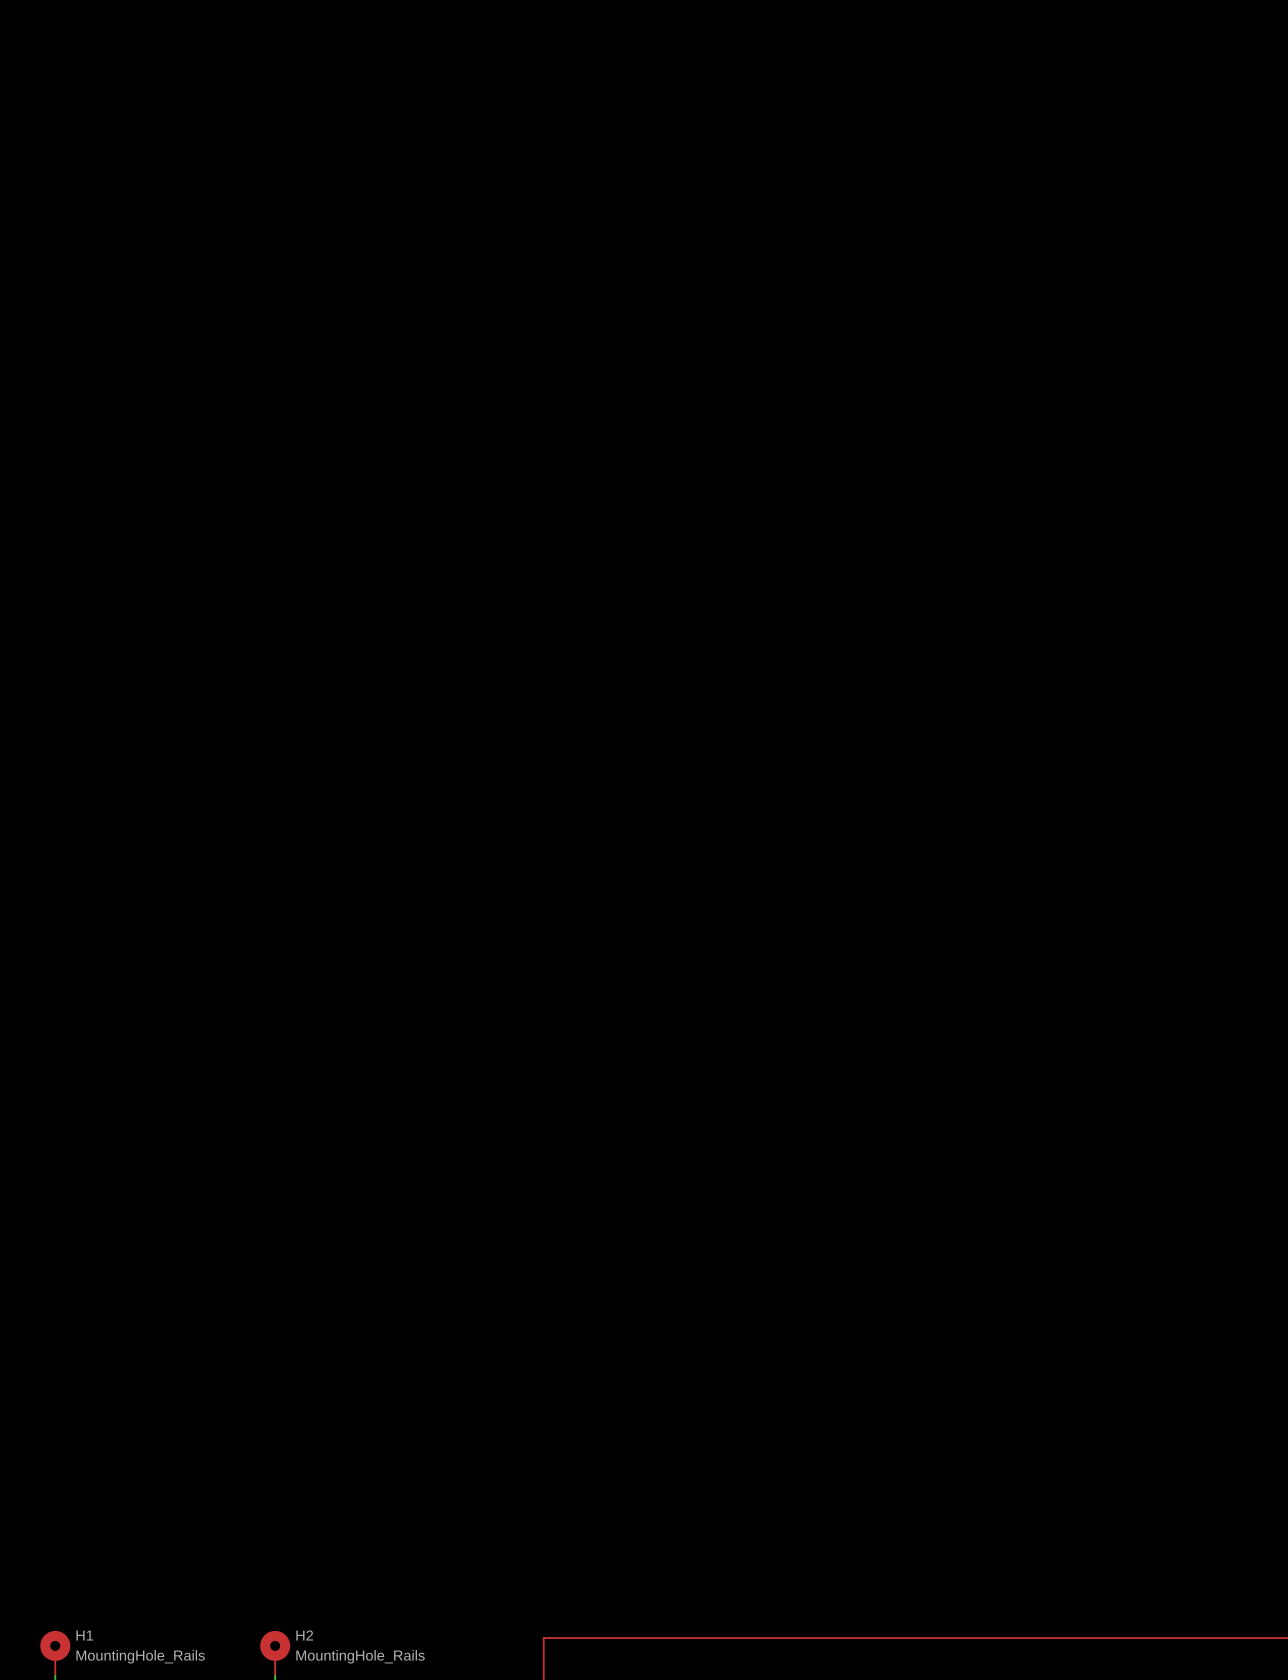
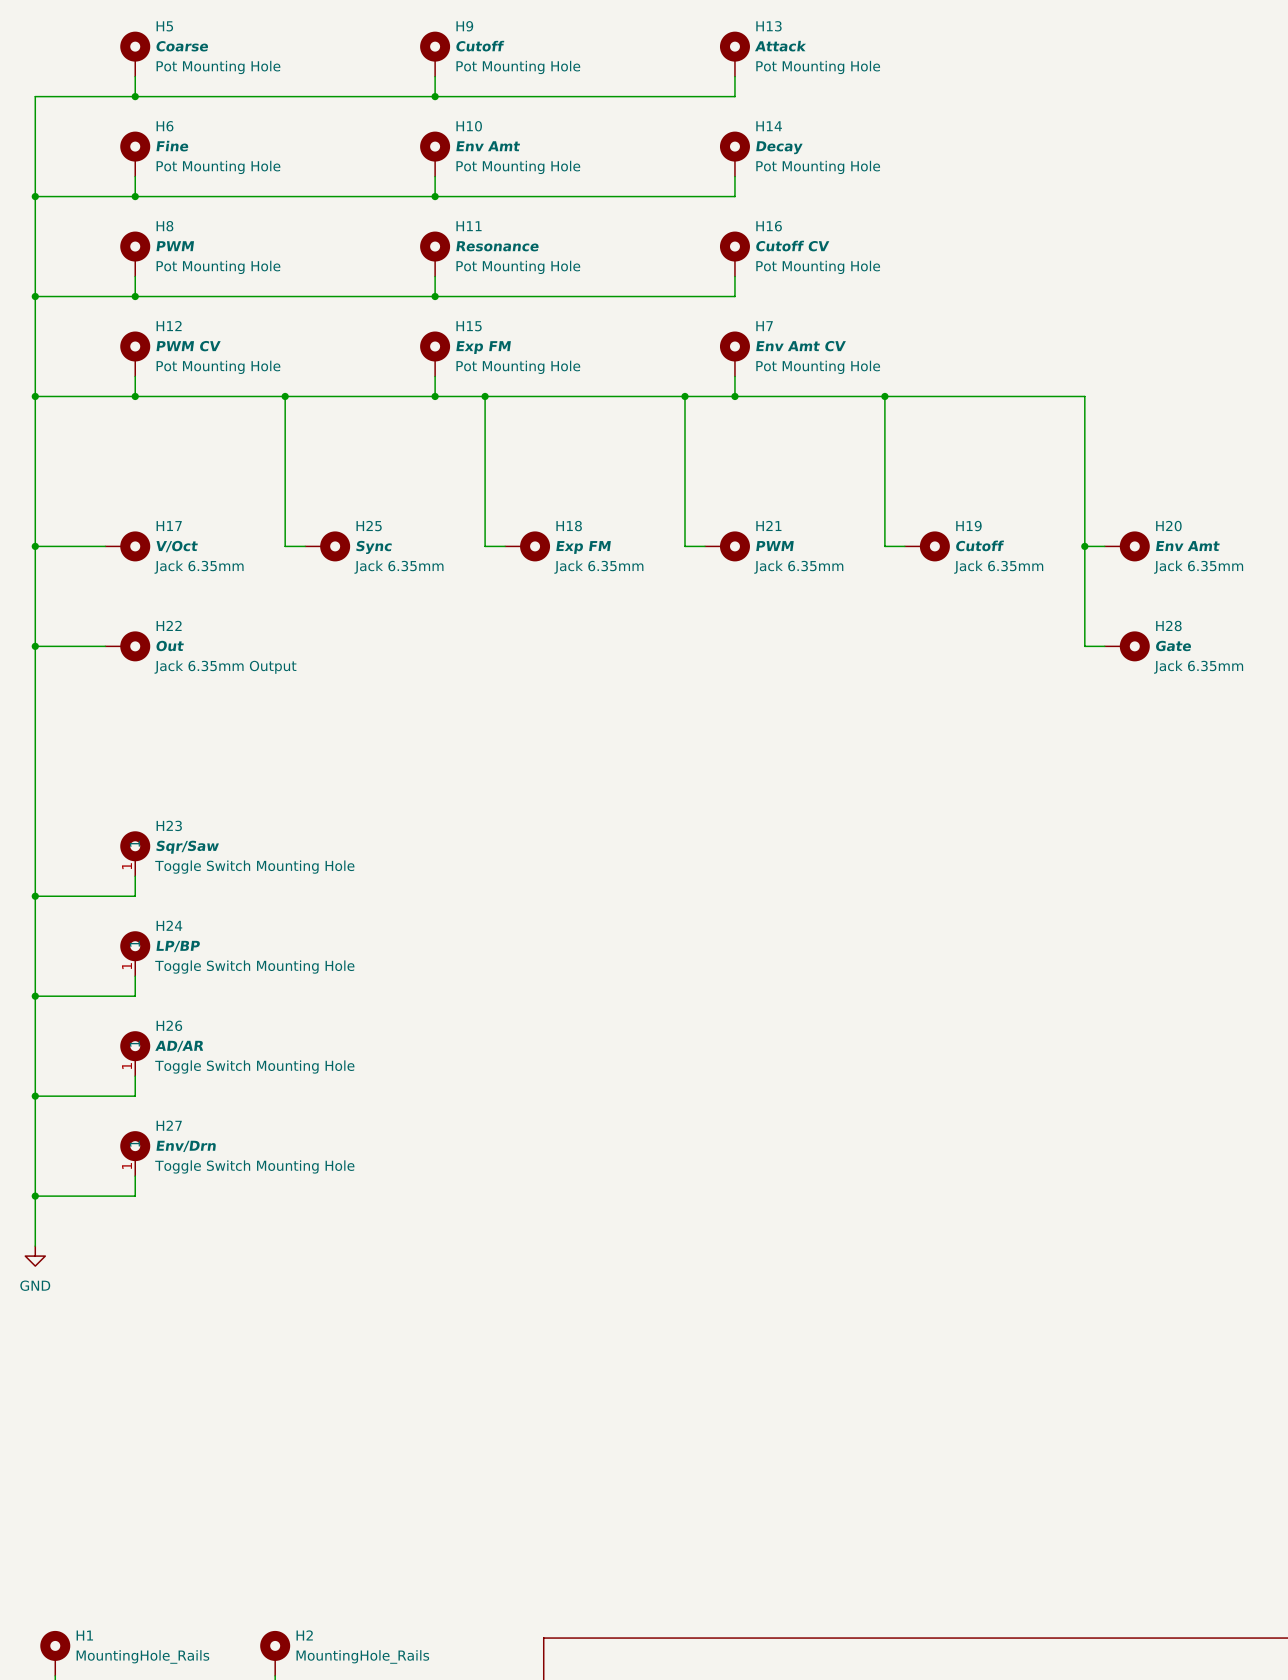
H5: none -> Coarse (135, 54)
H9: none -> Cutoff (435, 54)
H13: none -> Attack (734, 54)
wire: none -> (135, 76) (135, 96)
wire: none -> (435, 76) (435, 96)
wire: none -> (734, 76) (734, 96) (35, 96) (35, 1246)
junction: none -> (135, 96)
junction: none -> (435, 96)
H6: none -> Fine (135, 154)
H10: none -> Env Amt (435, 154)
H14: none -> Decay (734, 154)
wire: none -> (135, 176) (135, 196)
wire: none -> (435, 176) (435, 196)
wire: none -> (734, 176) (734, 196) (35, 196)
junction: none -> (35, 196)
junction: none -> (135, 196)
junction: none -> (435, 196)
H8: none -> PWM (135, 254)
H11: none -> Resonance (435, 254)
H16: none -> Cutoff CV (734, 254)
wire: none -> (135, 276) (135, 296)
wire: none -> (435, 276) (435, 296)
wire: none -> (734, 276) (734, 296) (35, 296)
junction: none -> (35, 296)
junction: none -> (135, 296)
junction: none -> (435, 296)
H12: none -> PWM CV (135, 353)
H15: none -> Exp FM (435, 353)
H7: none -> Env Amt CV (734, 353)
wire: none -> (135, 376) (135, 396)
wire: none -> (435, 376) (435, 396)
wire: none -> (734, 376) (734, 396)
wire: none -> (35, 396) (1084, 396) (1084, 646) (1104, 646)
junction: none -> (35, 396)
junction: none -> (135, 396)
wire: none -> (285, 396) (285, 546) (305, 546)
junction: none -> (285, 396)
junction: none -> (435, 396)
wire: none -> (485, 396) (485, 546) (505, 546)
junction: none -> (485, 396)
wire: none -> (684, 396) (684, 546) (704, 546)
junction: none -> (684, 396)
junction: none -> (734, 396)
wire: none -> (884, 396) (884, 546) (904, 546)
junction: none -> (884, 396)
wire: none -> (35, 546) (105, 546)
junction: none -> (35, 546)
H17: none -> V/Oct (127, 546)
H25: none -> Sync (327, 546)
H18: none -> Exp FM (527, 546)
H21: none -> PWM (727, 546)
H19: none -> Cutoff (927, 546)
wire: none -> (1084, 546) (1104, 546)
junction: none -> (1084, 546)
H20: none -> Env Amt (1127, 546)
wire: none -> (35, 646) (105, 646)
junction: none -> (35, 646)
H22: none -> Out (127, 646)
H28: none -> Gate (1127, 646)
H23: none -> Sqr/Saw (135, 853)
wire: none -> (135, 876) (135, 896) (35, 896)
junction: none -> (35, 896)
H24: none -> LP/BP (135, 953)
wire: none -> (135, 976) (135, 996) (35, 996)
junction: none -> (35, 996)
H26: none -> AD/AR (135, 1053)
wire: none -> (135, 1076) (135, 1096) (35, 1096)
junction: none -> (35, 1096)
H27: none -> Env/Drn (135, 1153)
wire: none -> (135, 1176) (135, 1196) (35, 1196)
junction: none -> (35, 1196)
power symbol: none -> GND (35, 1256)

